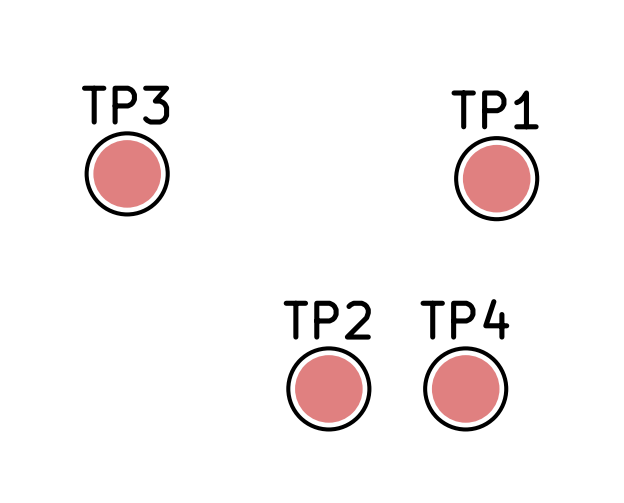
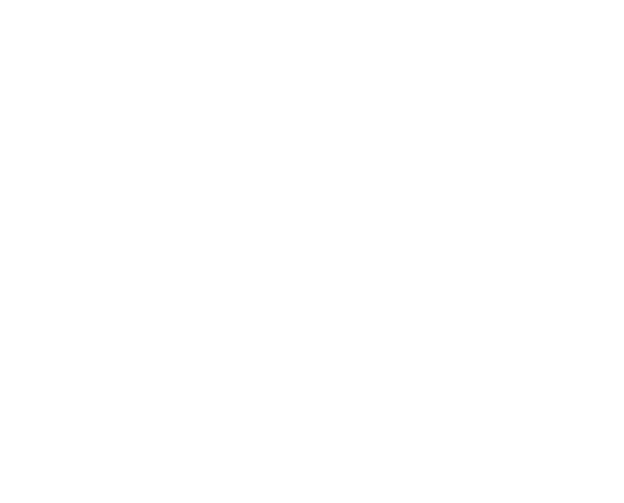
TP3: (127, 173) -> none
TP1: (496, 178) -> none
TP2: (328, 388) -> none
TP4: (465, 388) -> none

